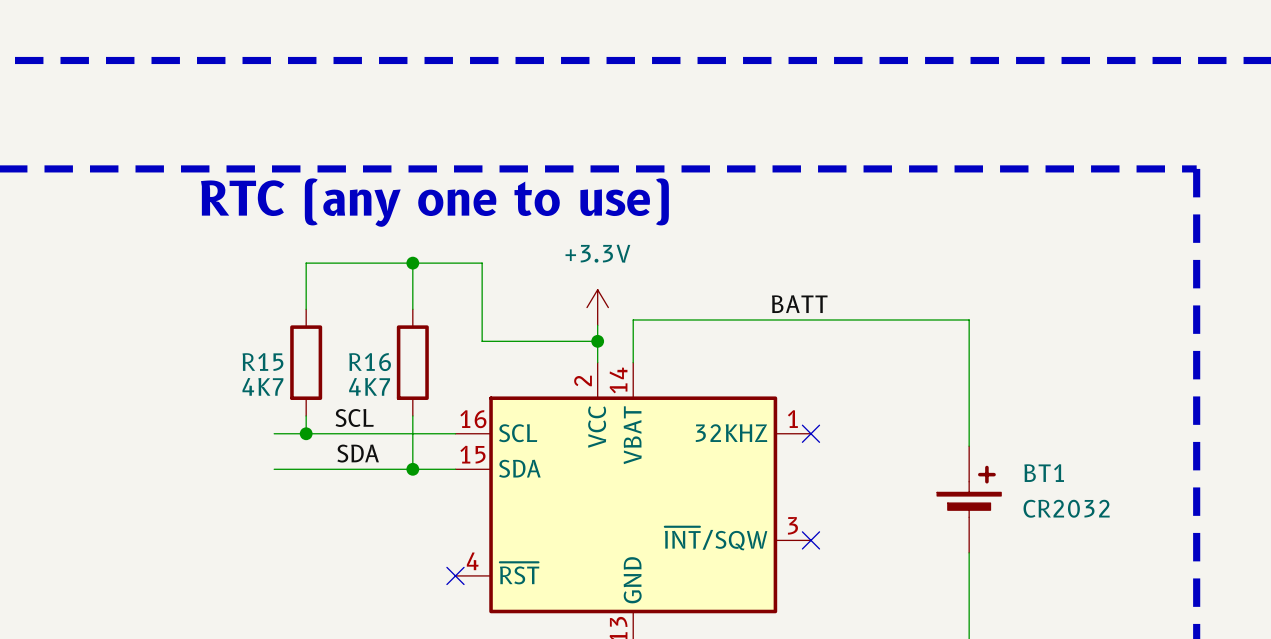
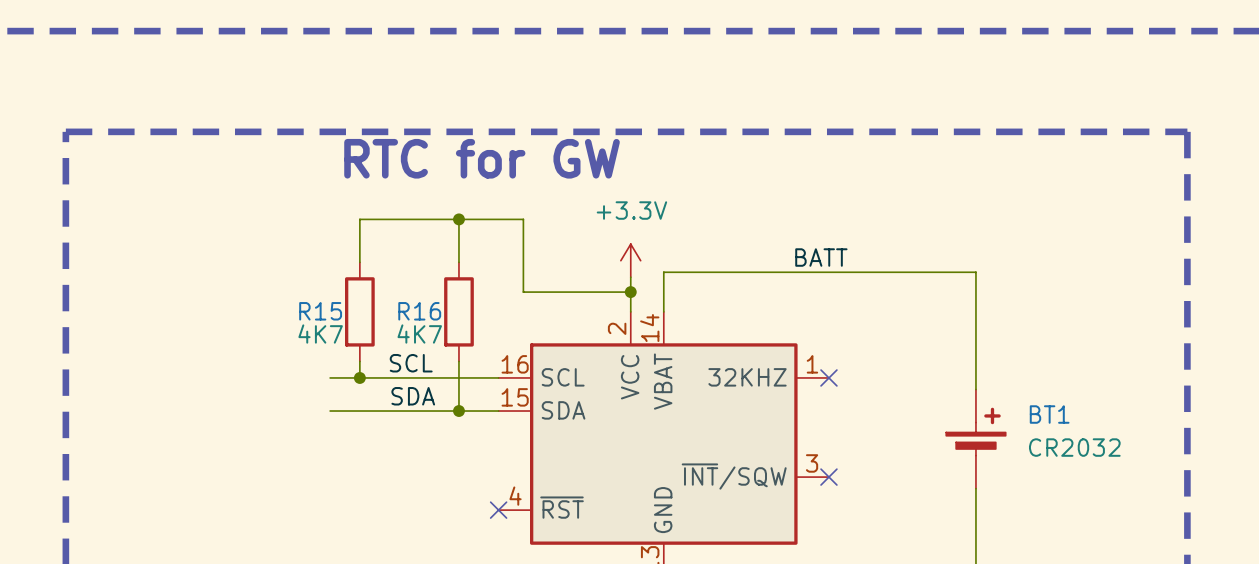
text: RTC (any one to use) (434, 202) -> RTC for GW (482, 158)

